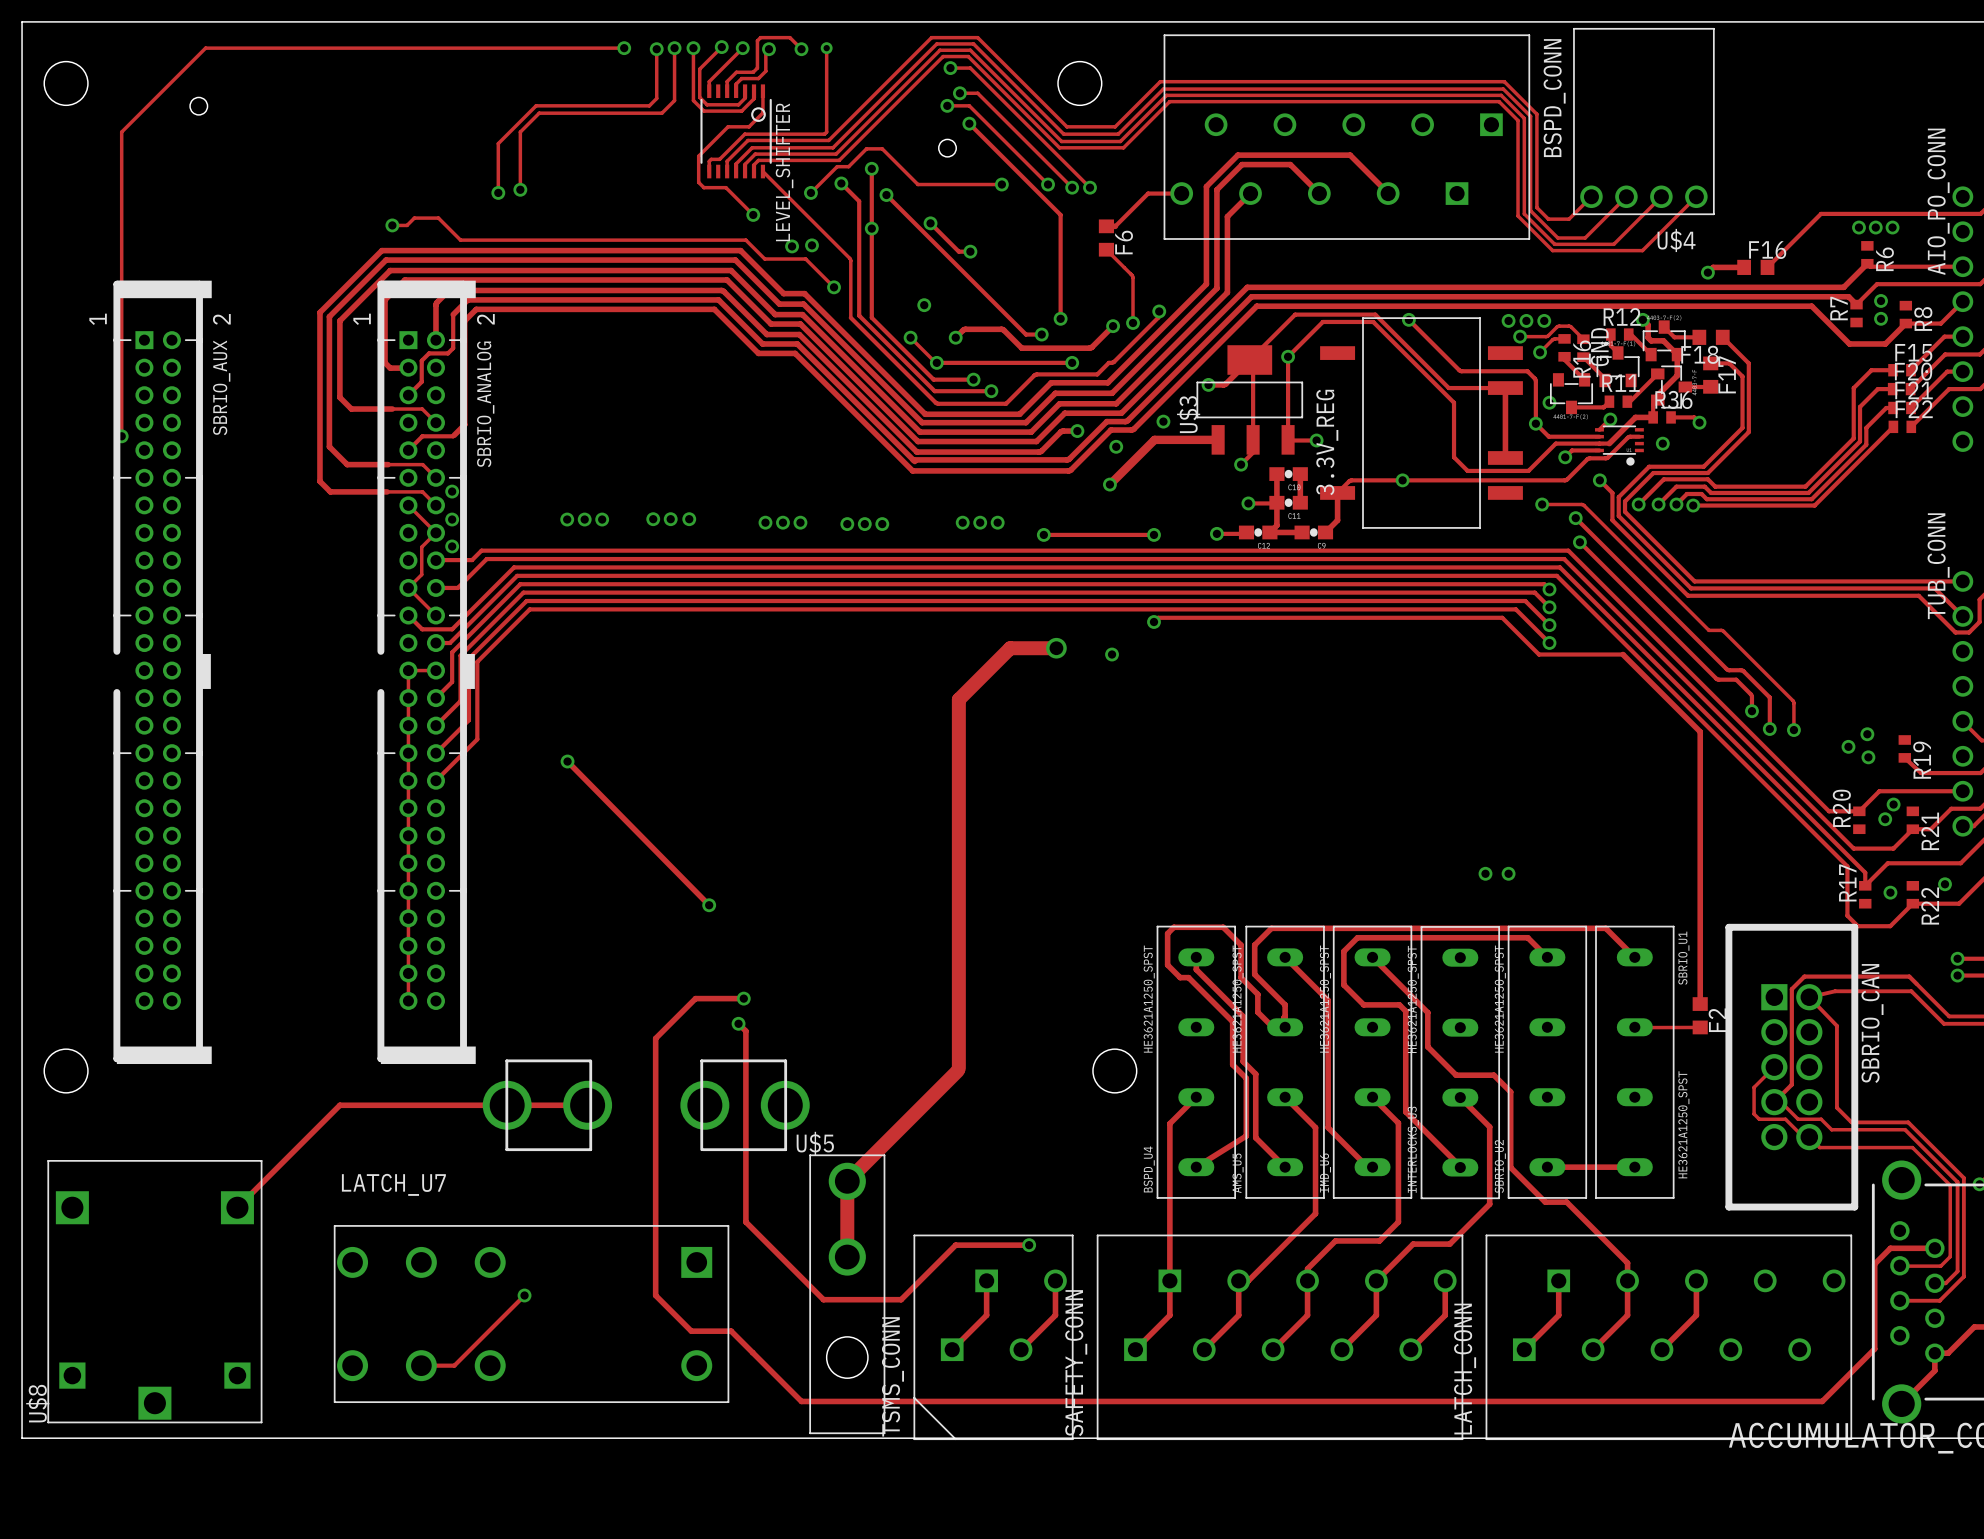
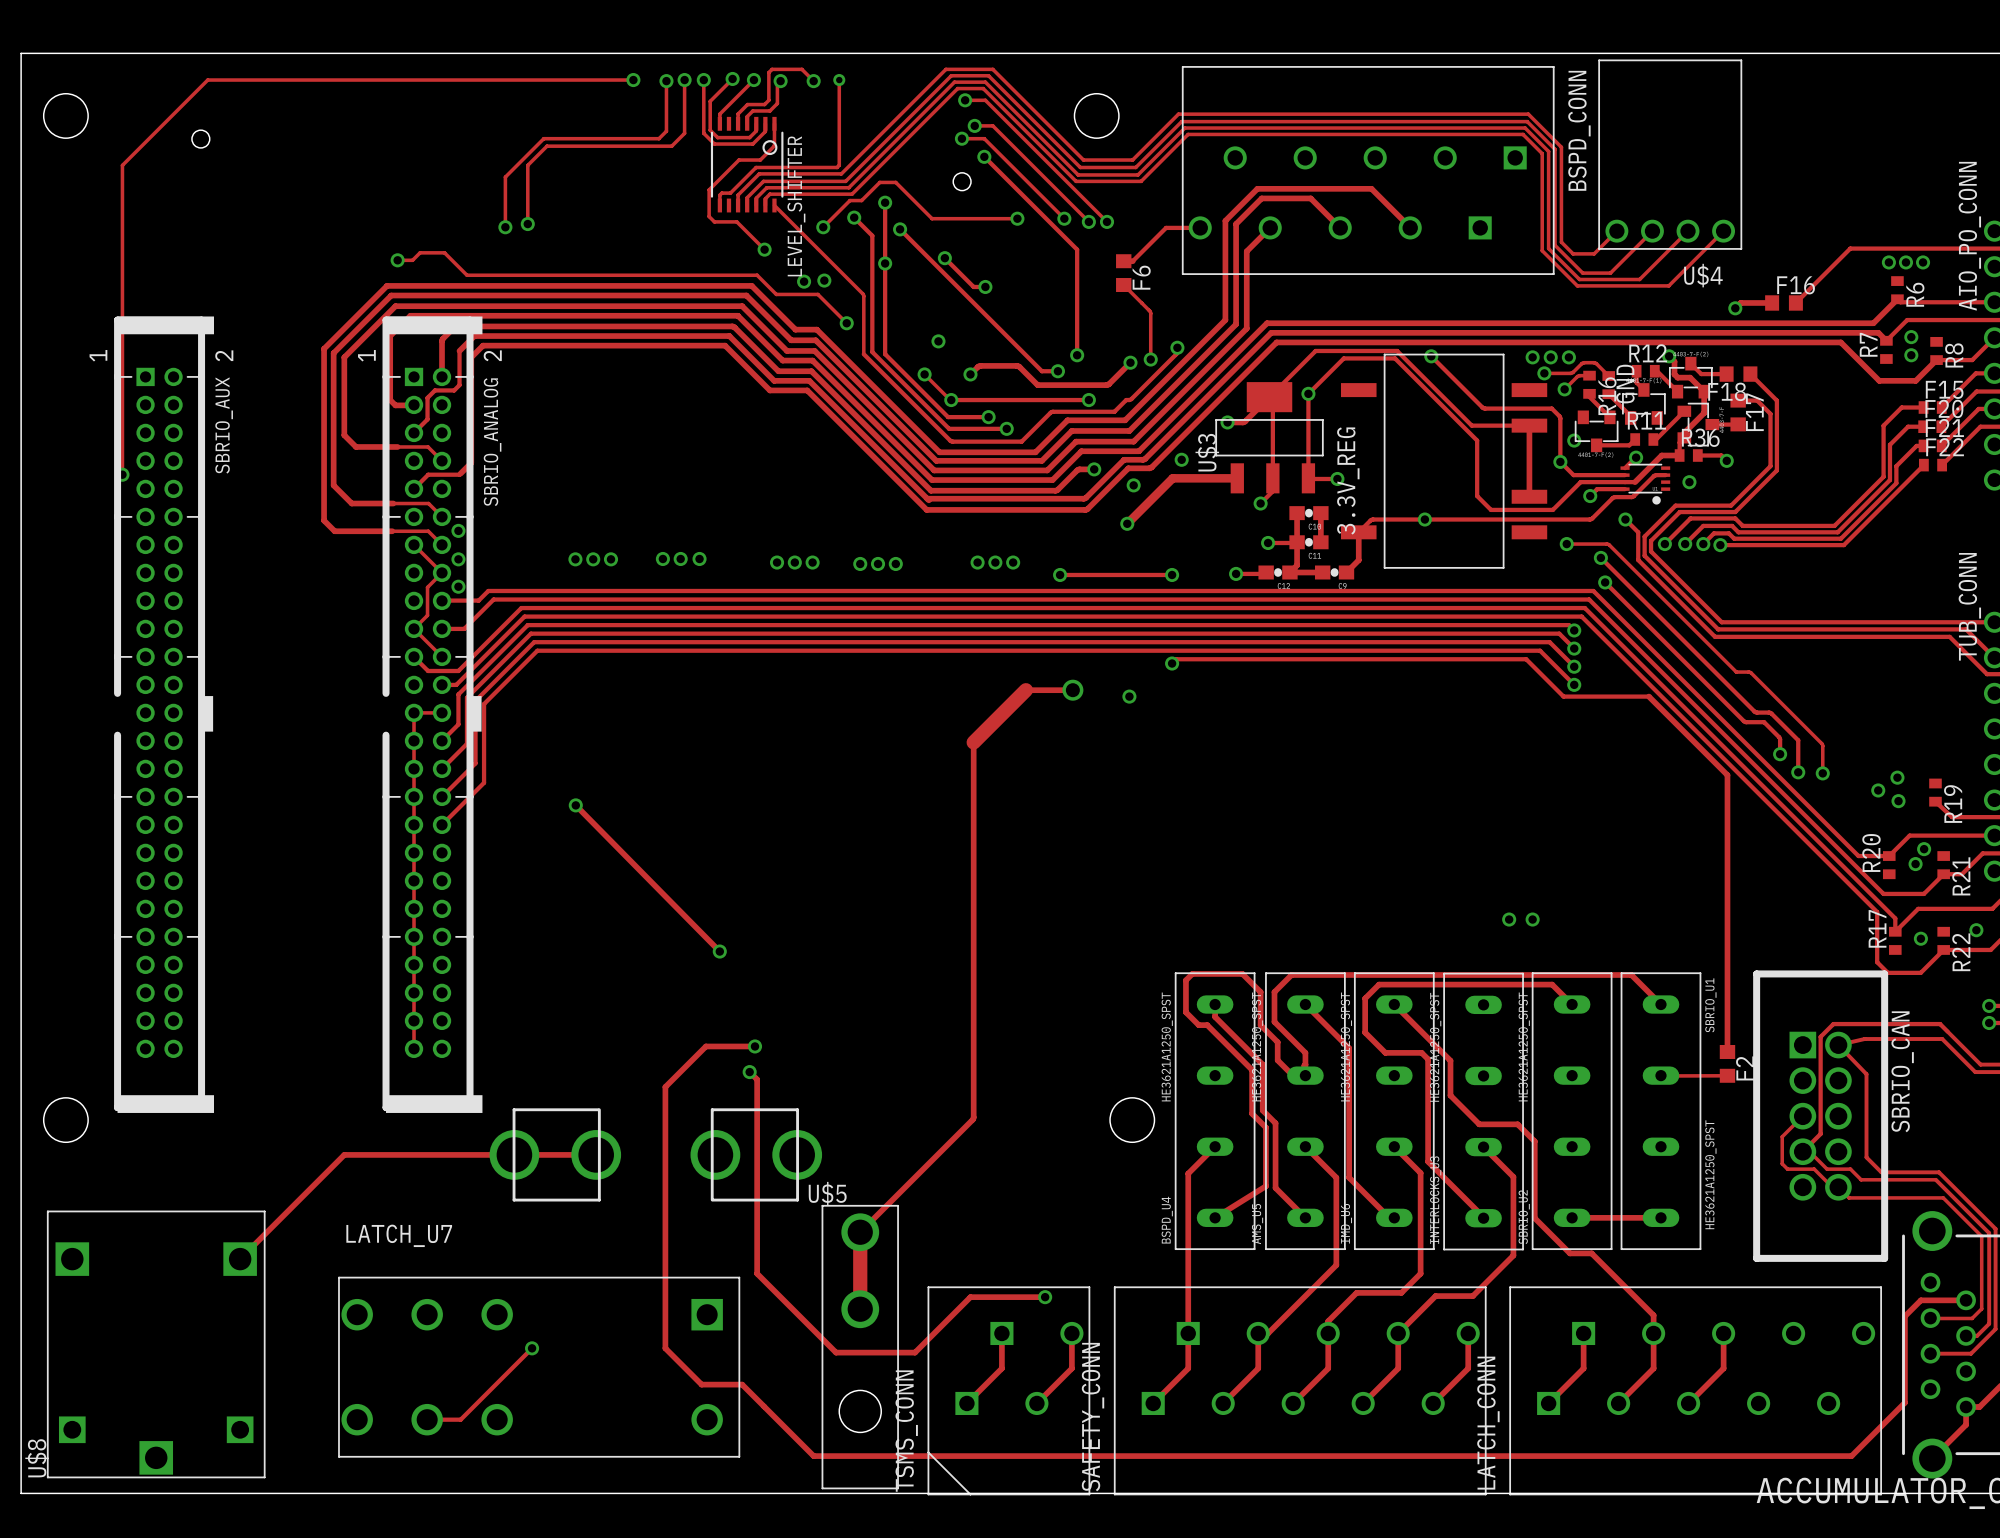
track width: thick (1010, 648) (1056, 648) -> thin (1025, 690) (1072, 690)
track width: thick (958, 699) (958, 1068) -> thin (973, 742) (973, 1117)
track width: thick (957, 1070) (847, 1181) -> thin (972, 1119) (860, 1232)

